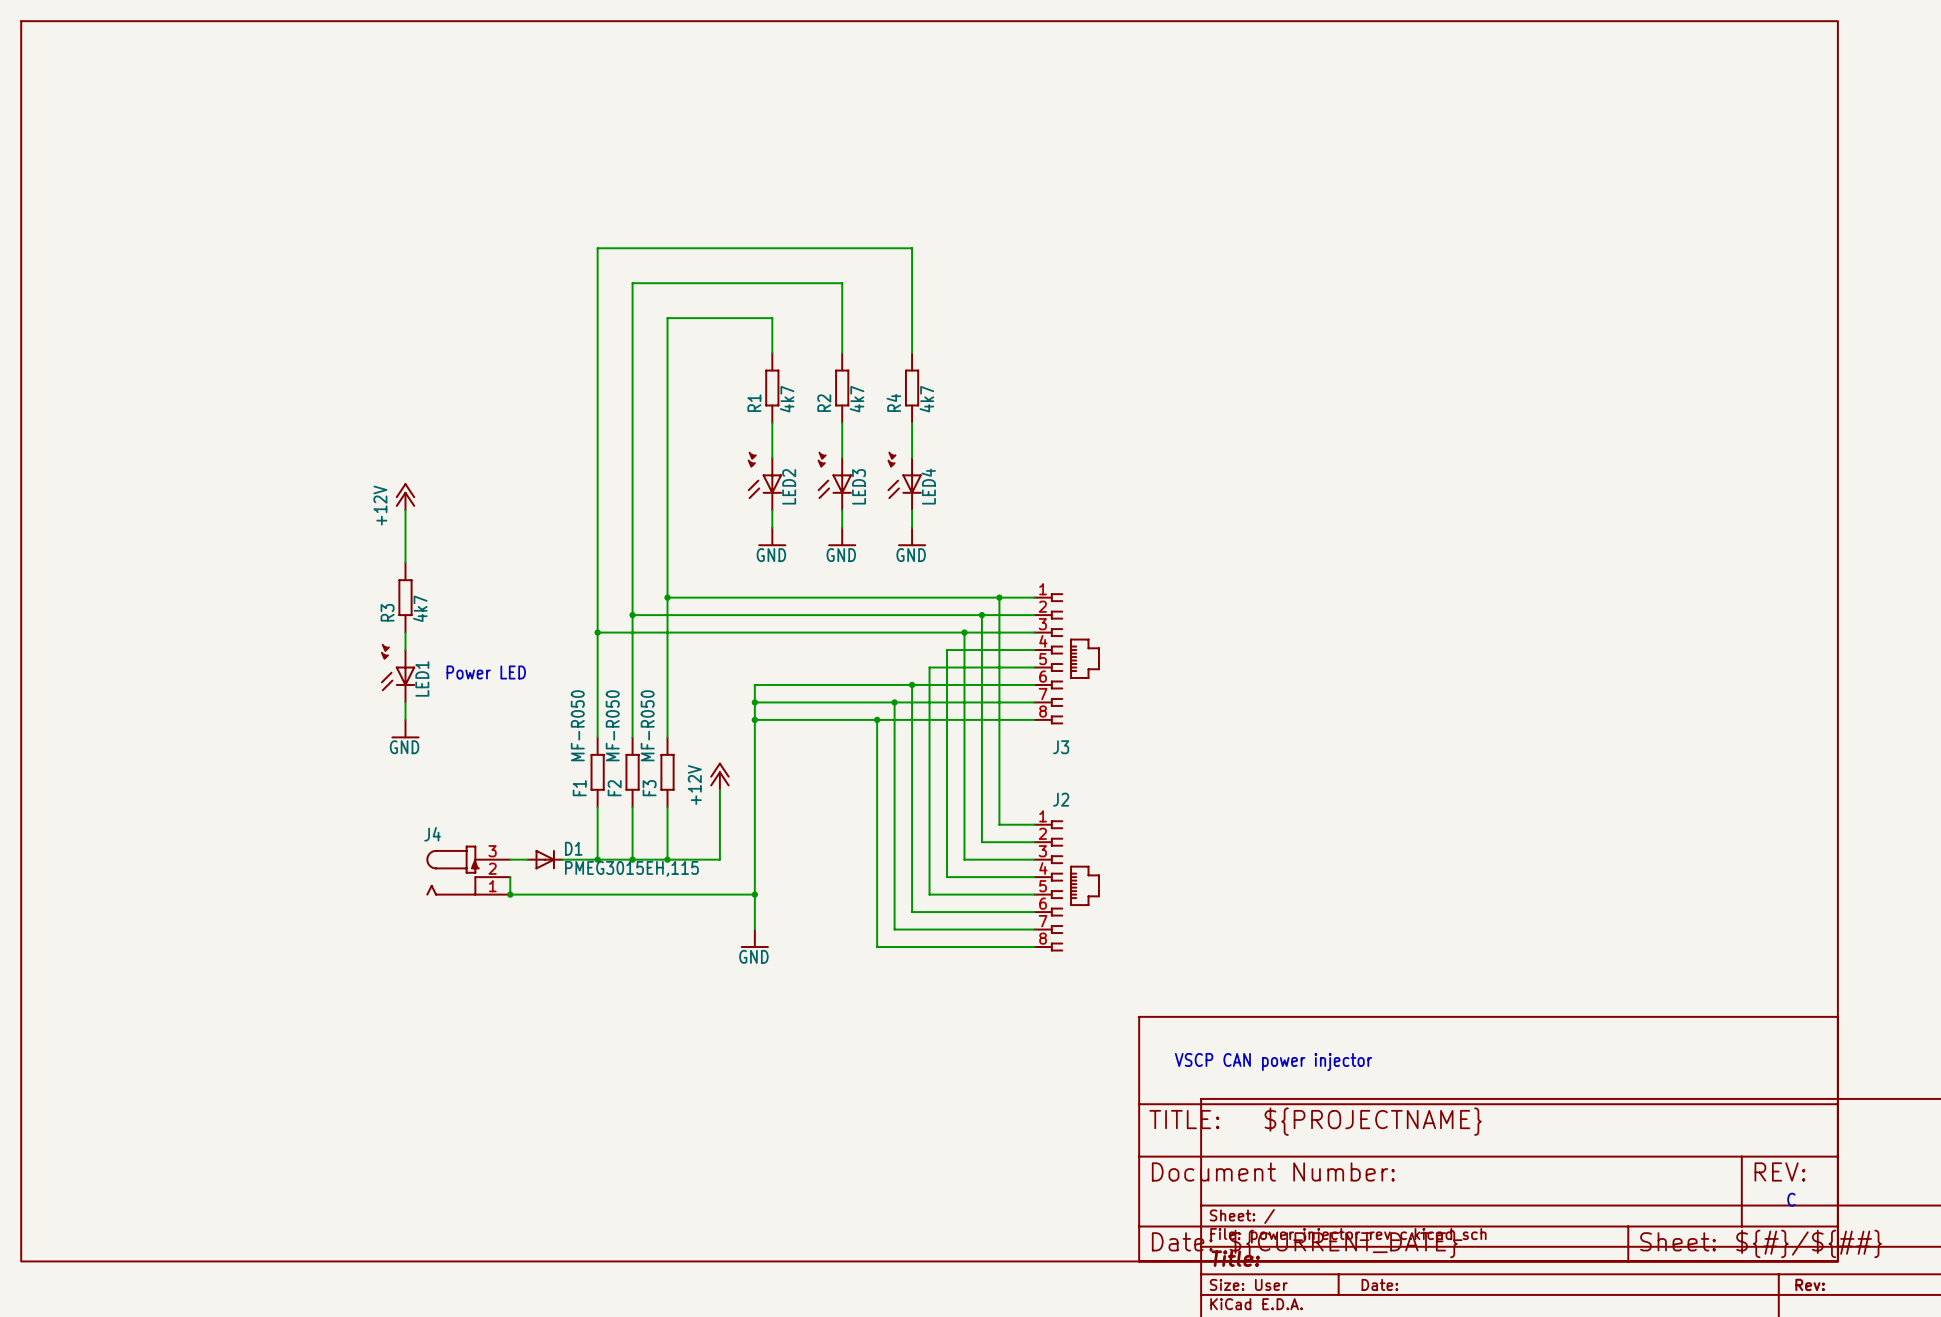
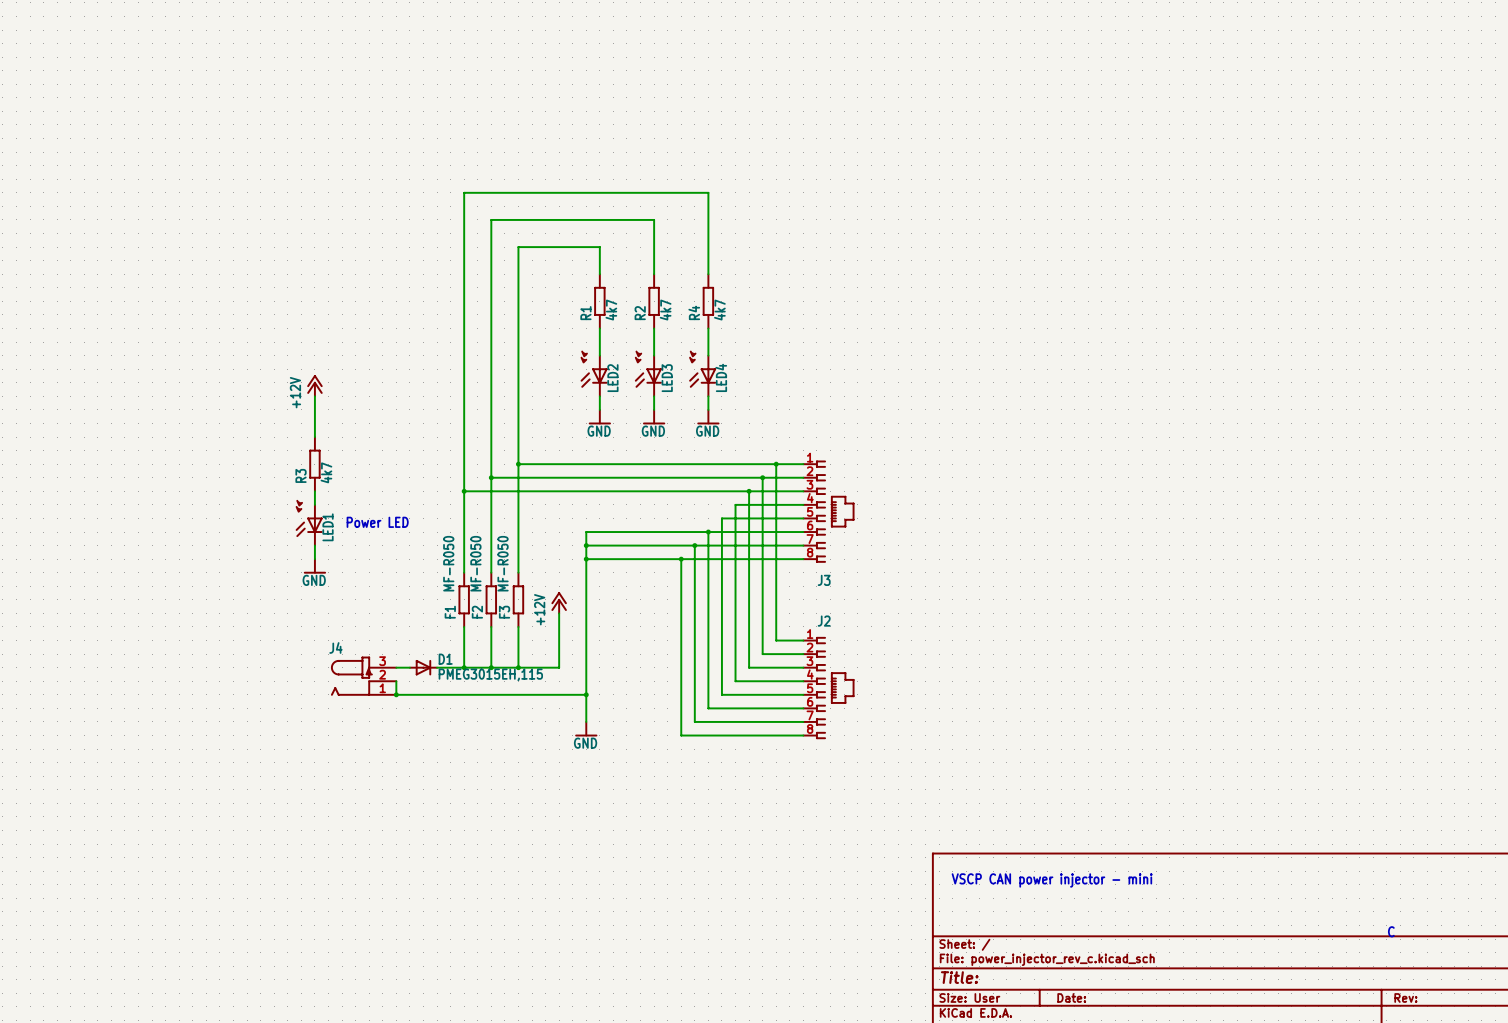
power symbol: (929, 641) -> none
text: VSCP CAN power injector (1273, 1061) -> none
text: none -> VSCP CAN power injector - mini (1052, 880)
power symbol: (1488, 1139) -> none

